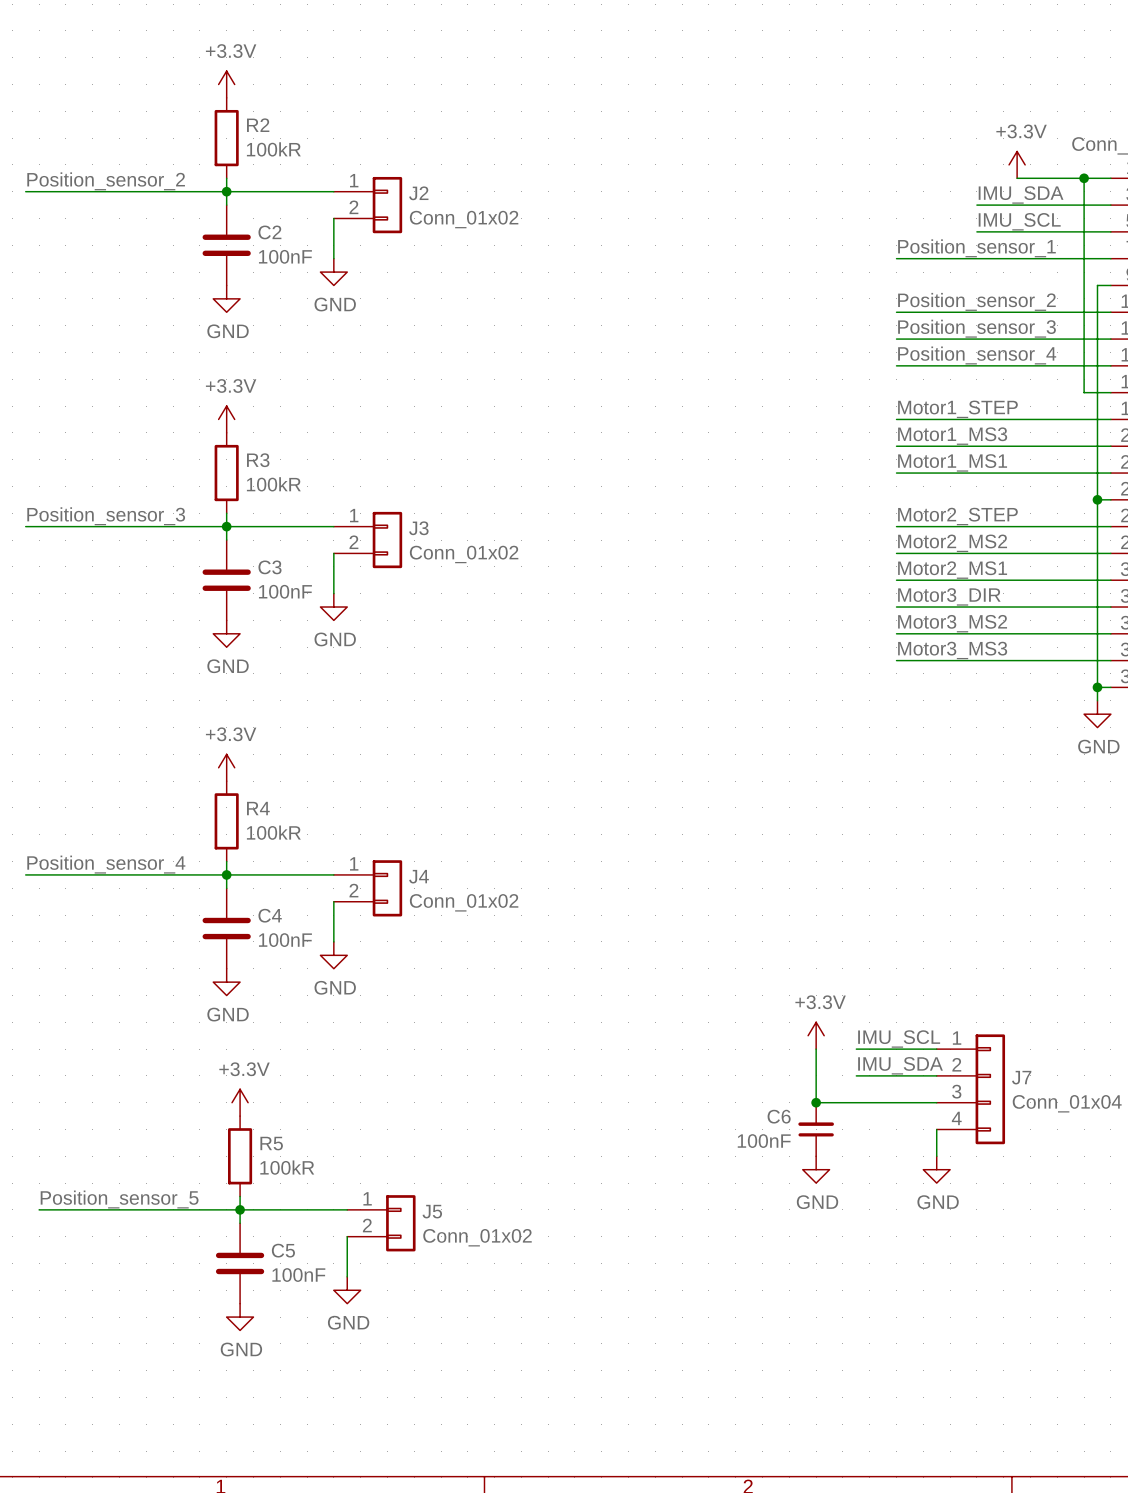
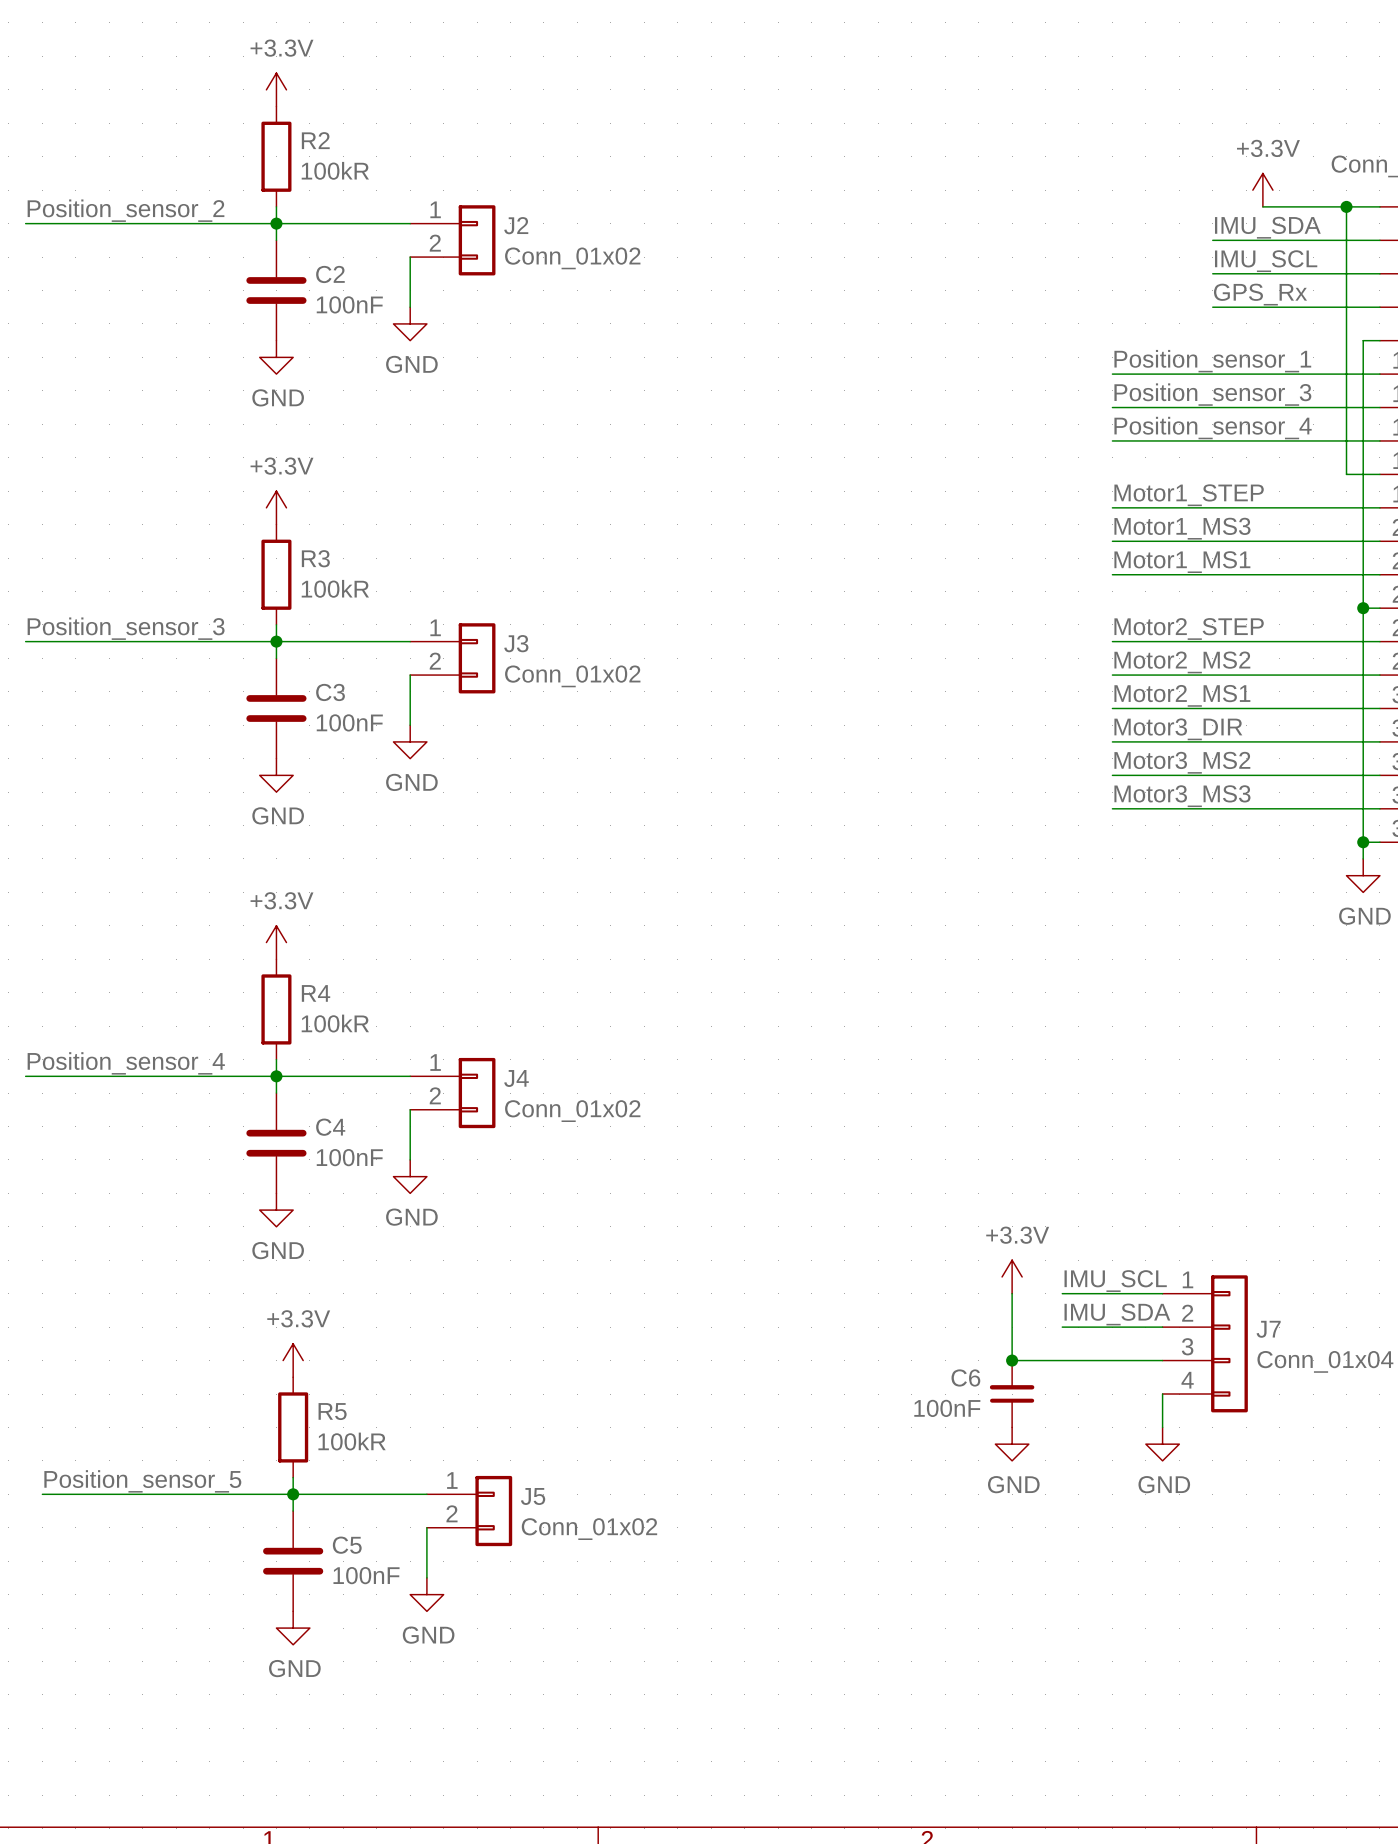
label: Position_sensor_1 (976, 248) -> none
label: none -> GPS_Rx (1260, 294)
wire: (896, 258) (976, 258) -> none
label: Position_sensor_2 (976, 301) -> Position_sensor_1 (1212, 361)

